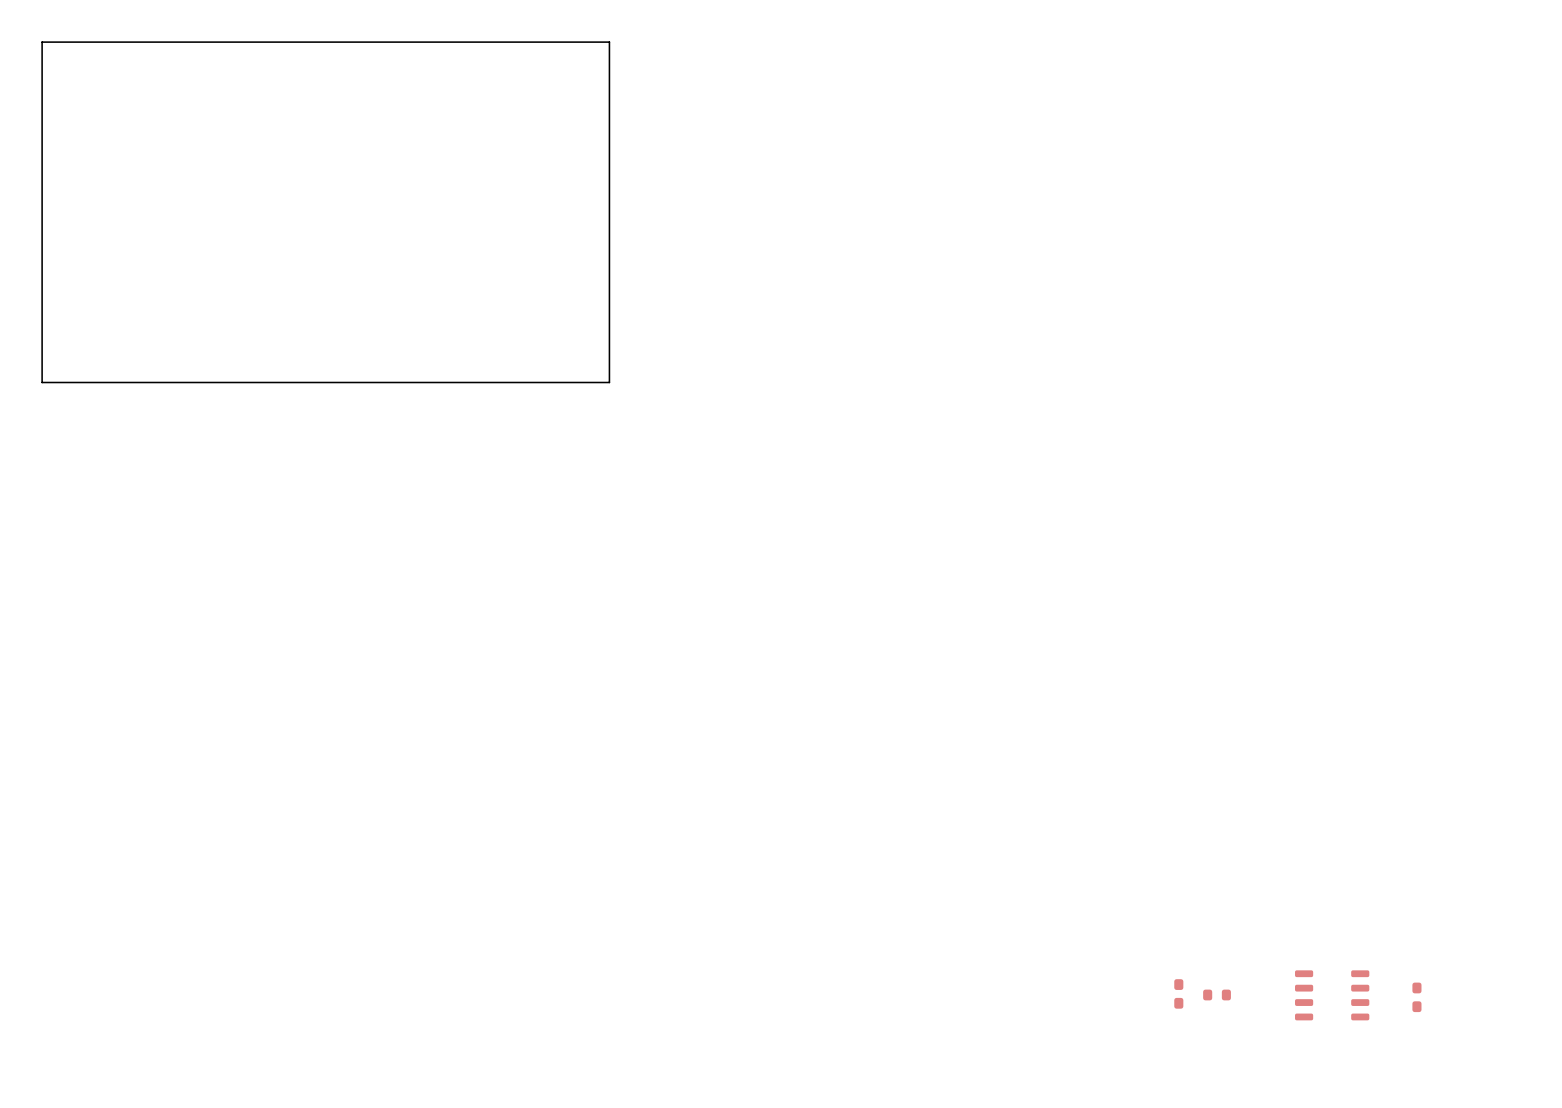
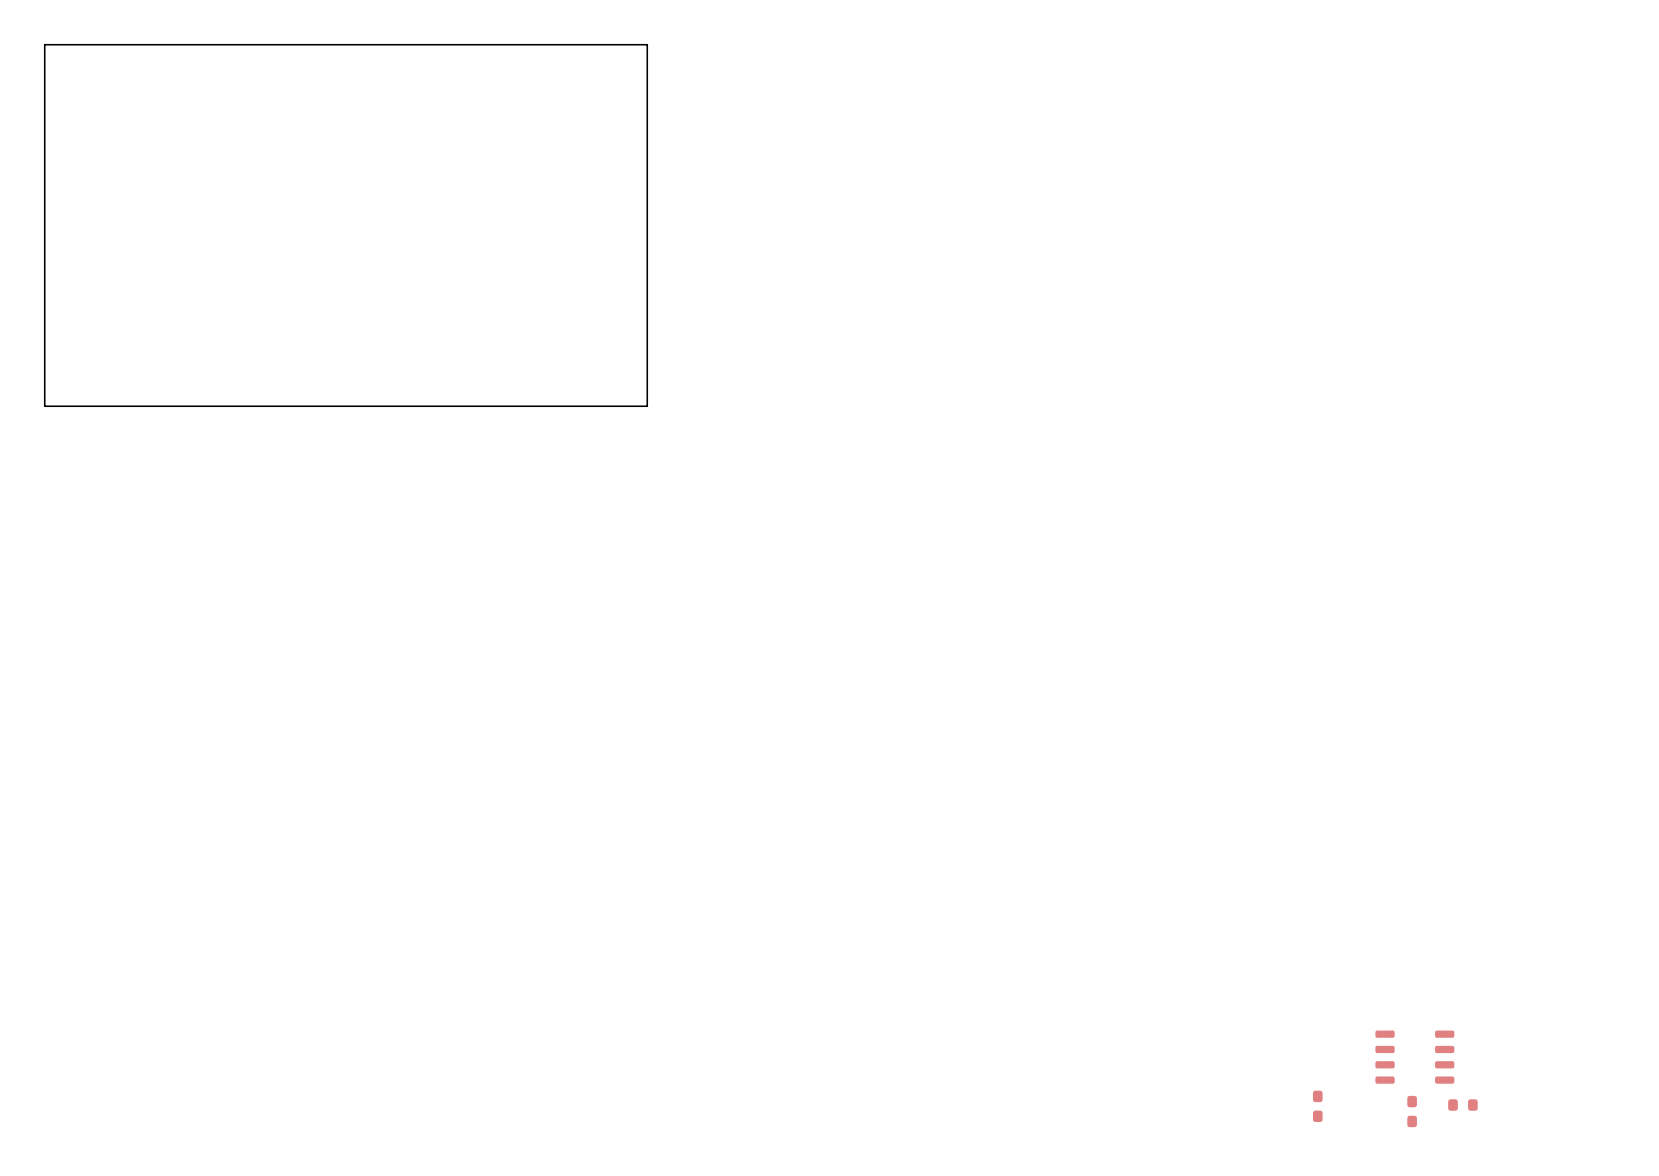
part position: (1178, 993) -> (1317, 1106)
part position: (1217, 994) -> (1462, 1105)
part: (1416, 997) -> none
part: none -> (1412, 1111)

